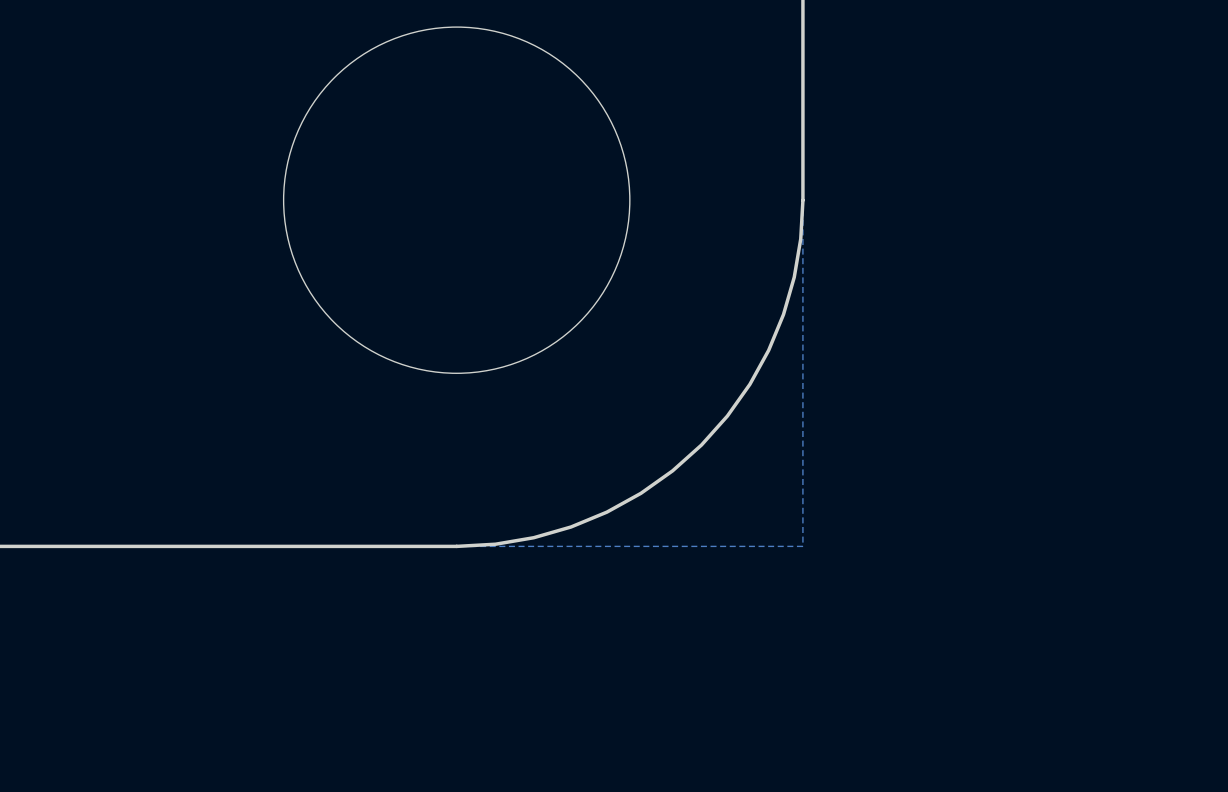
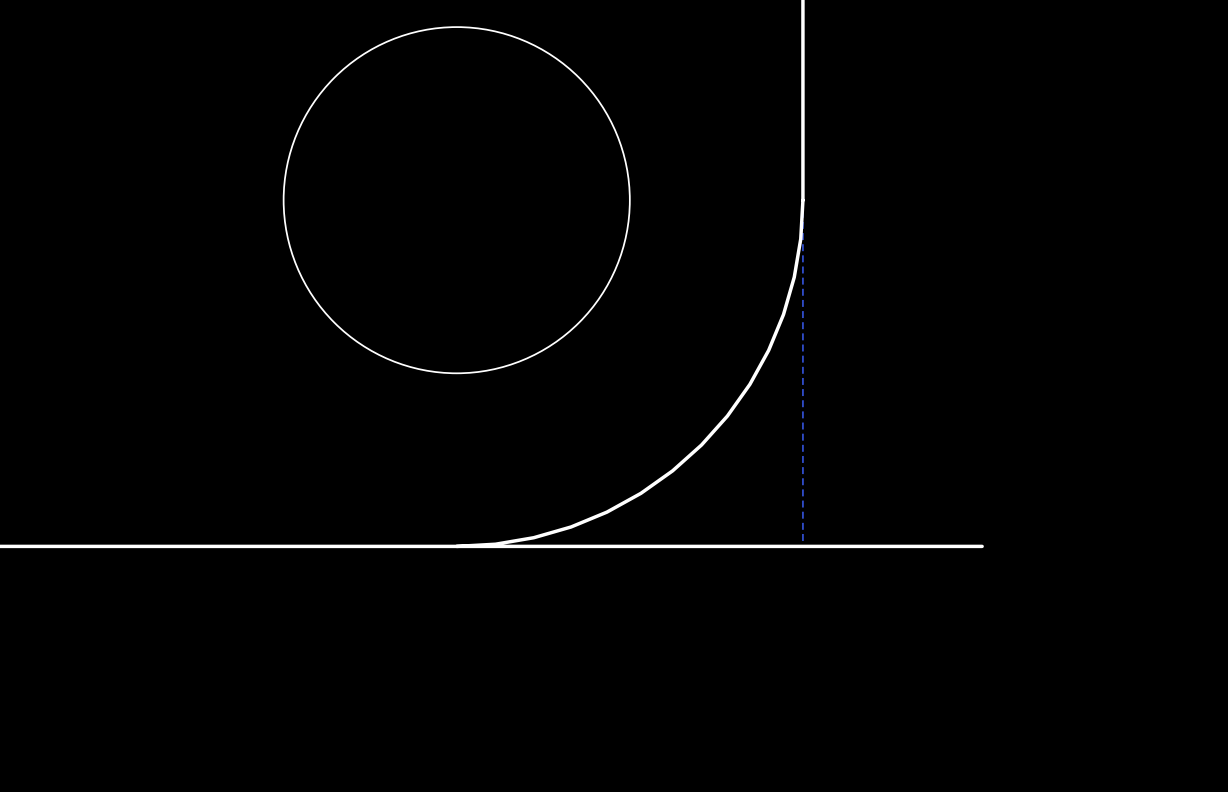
board edge: none -> (456, 546) (982, 546)

